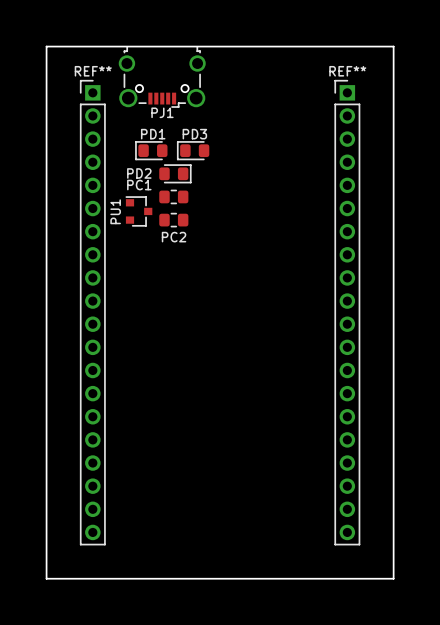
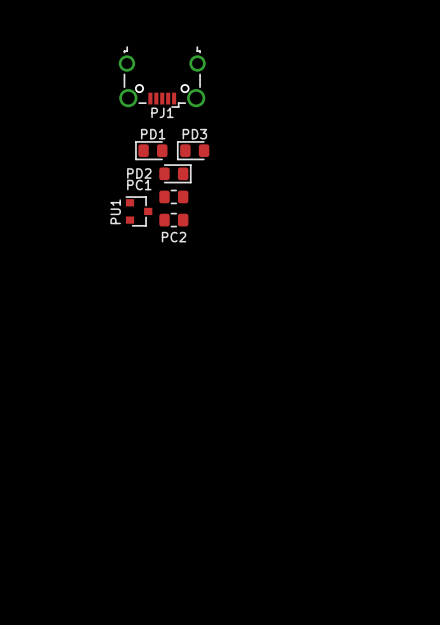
board edge: (46, 46) (393, 46) (393, 578) (46, 578) (46, 46) -> none
REF**: (92, 312) -> none
REF**: (347, 312) -> none

